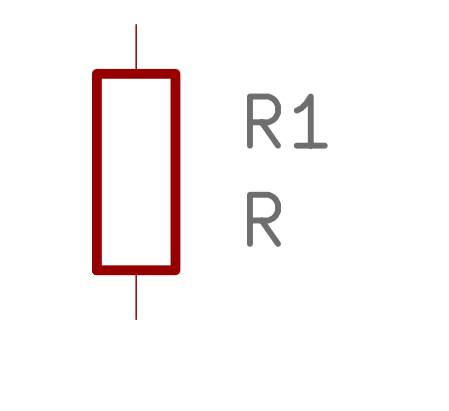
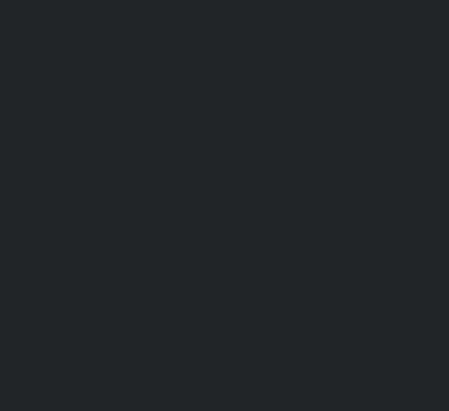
R1: R (136, 172) -> none

